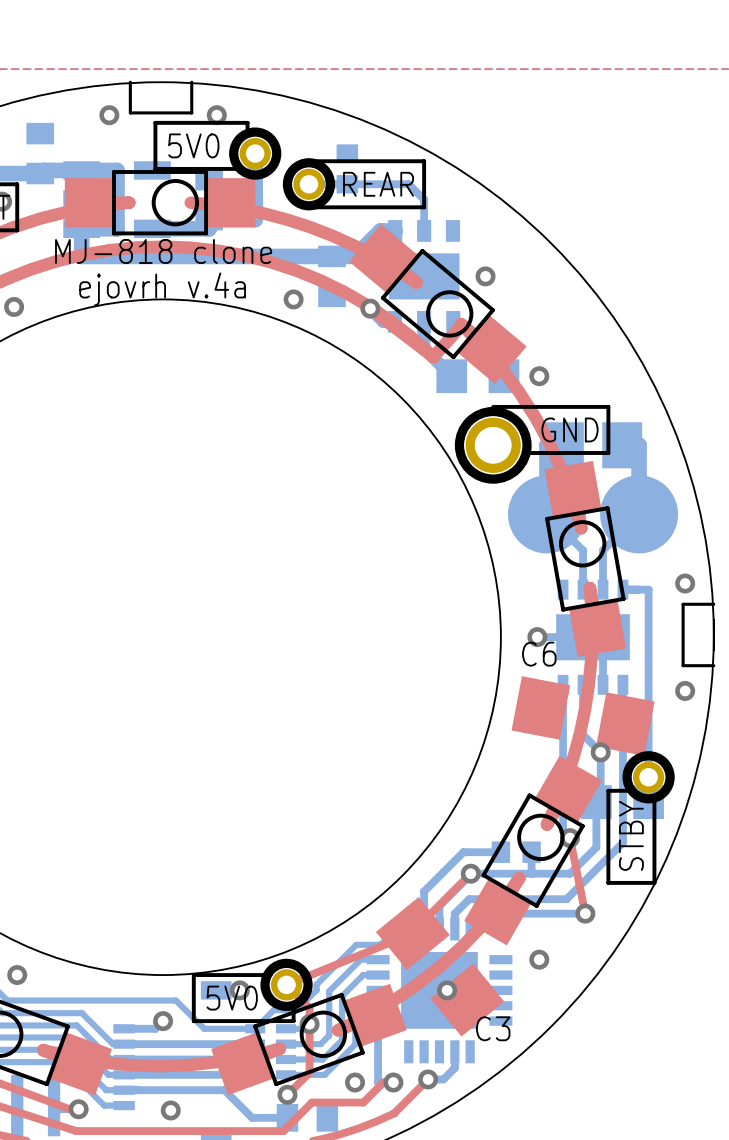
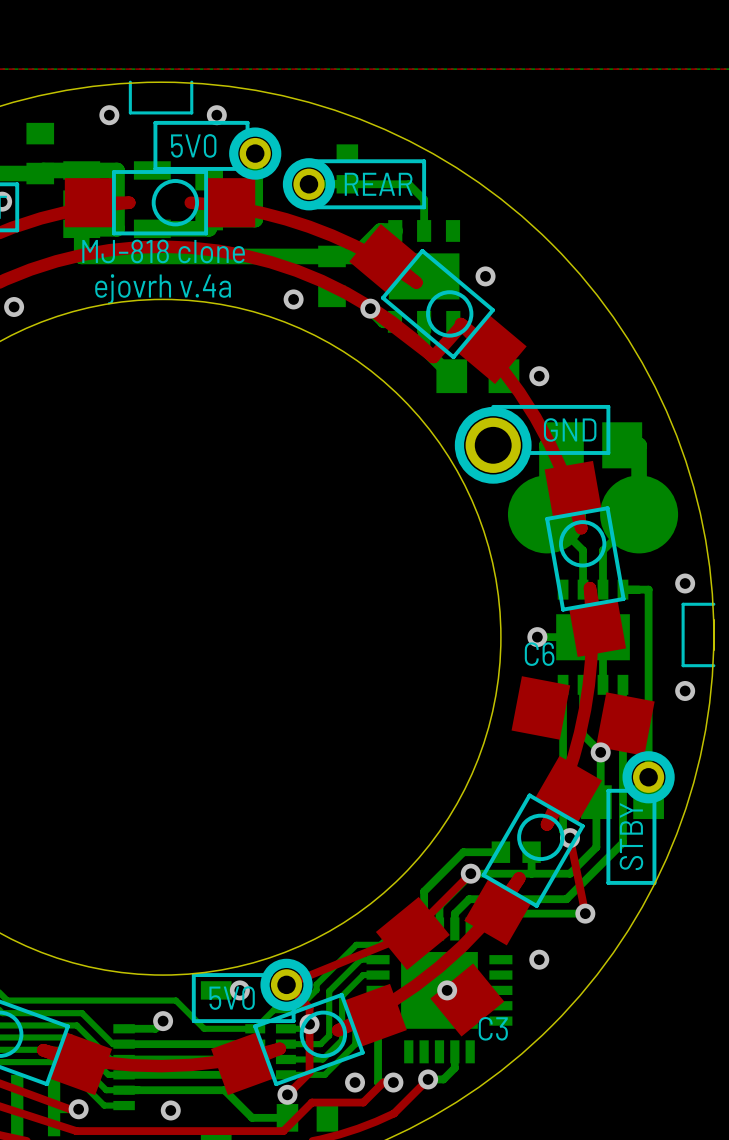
via: (17, 975) -> none

